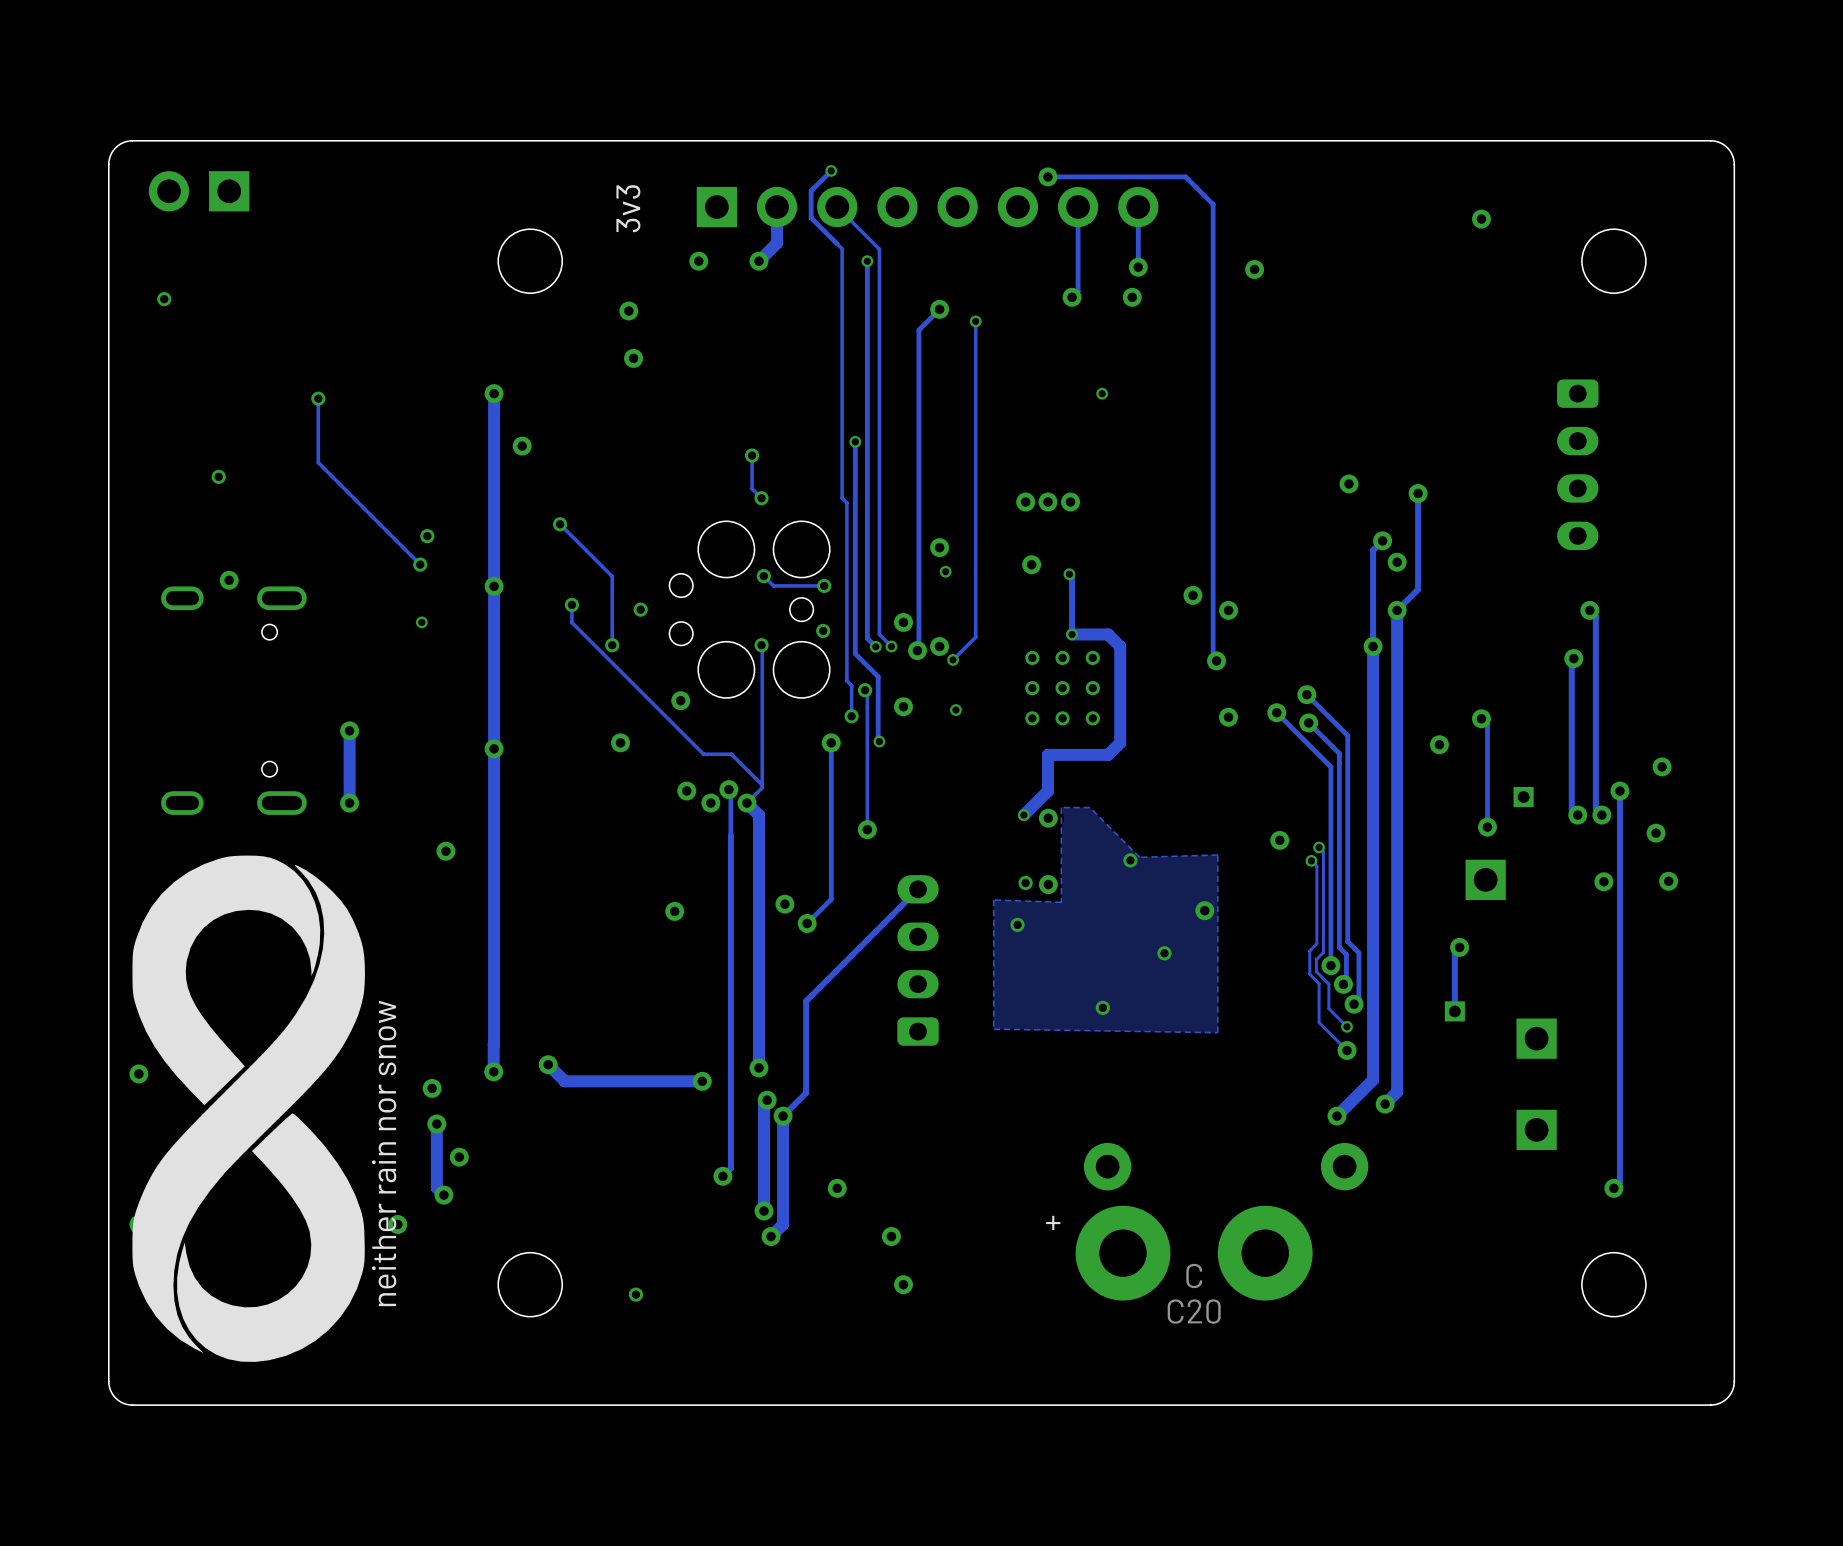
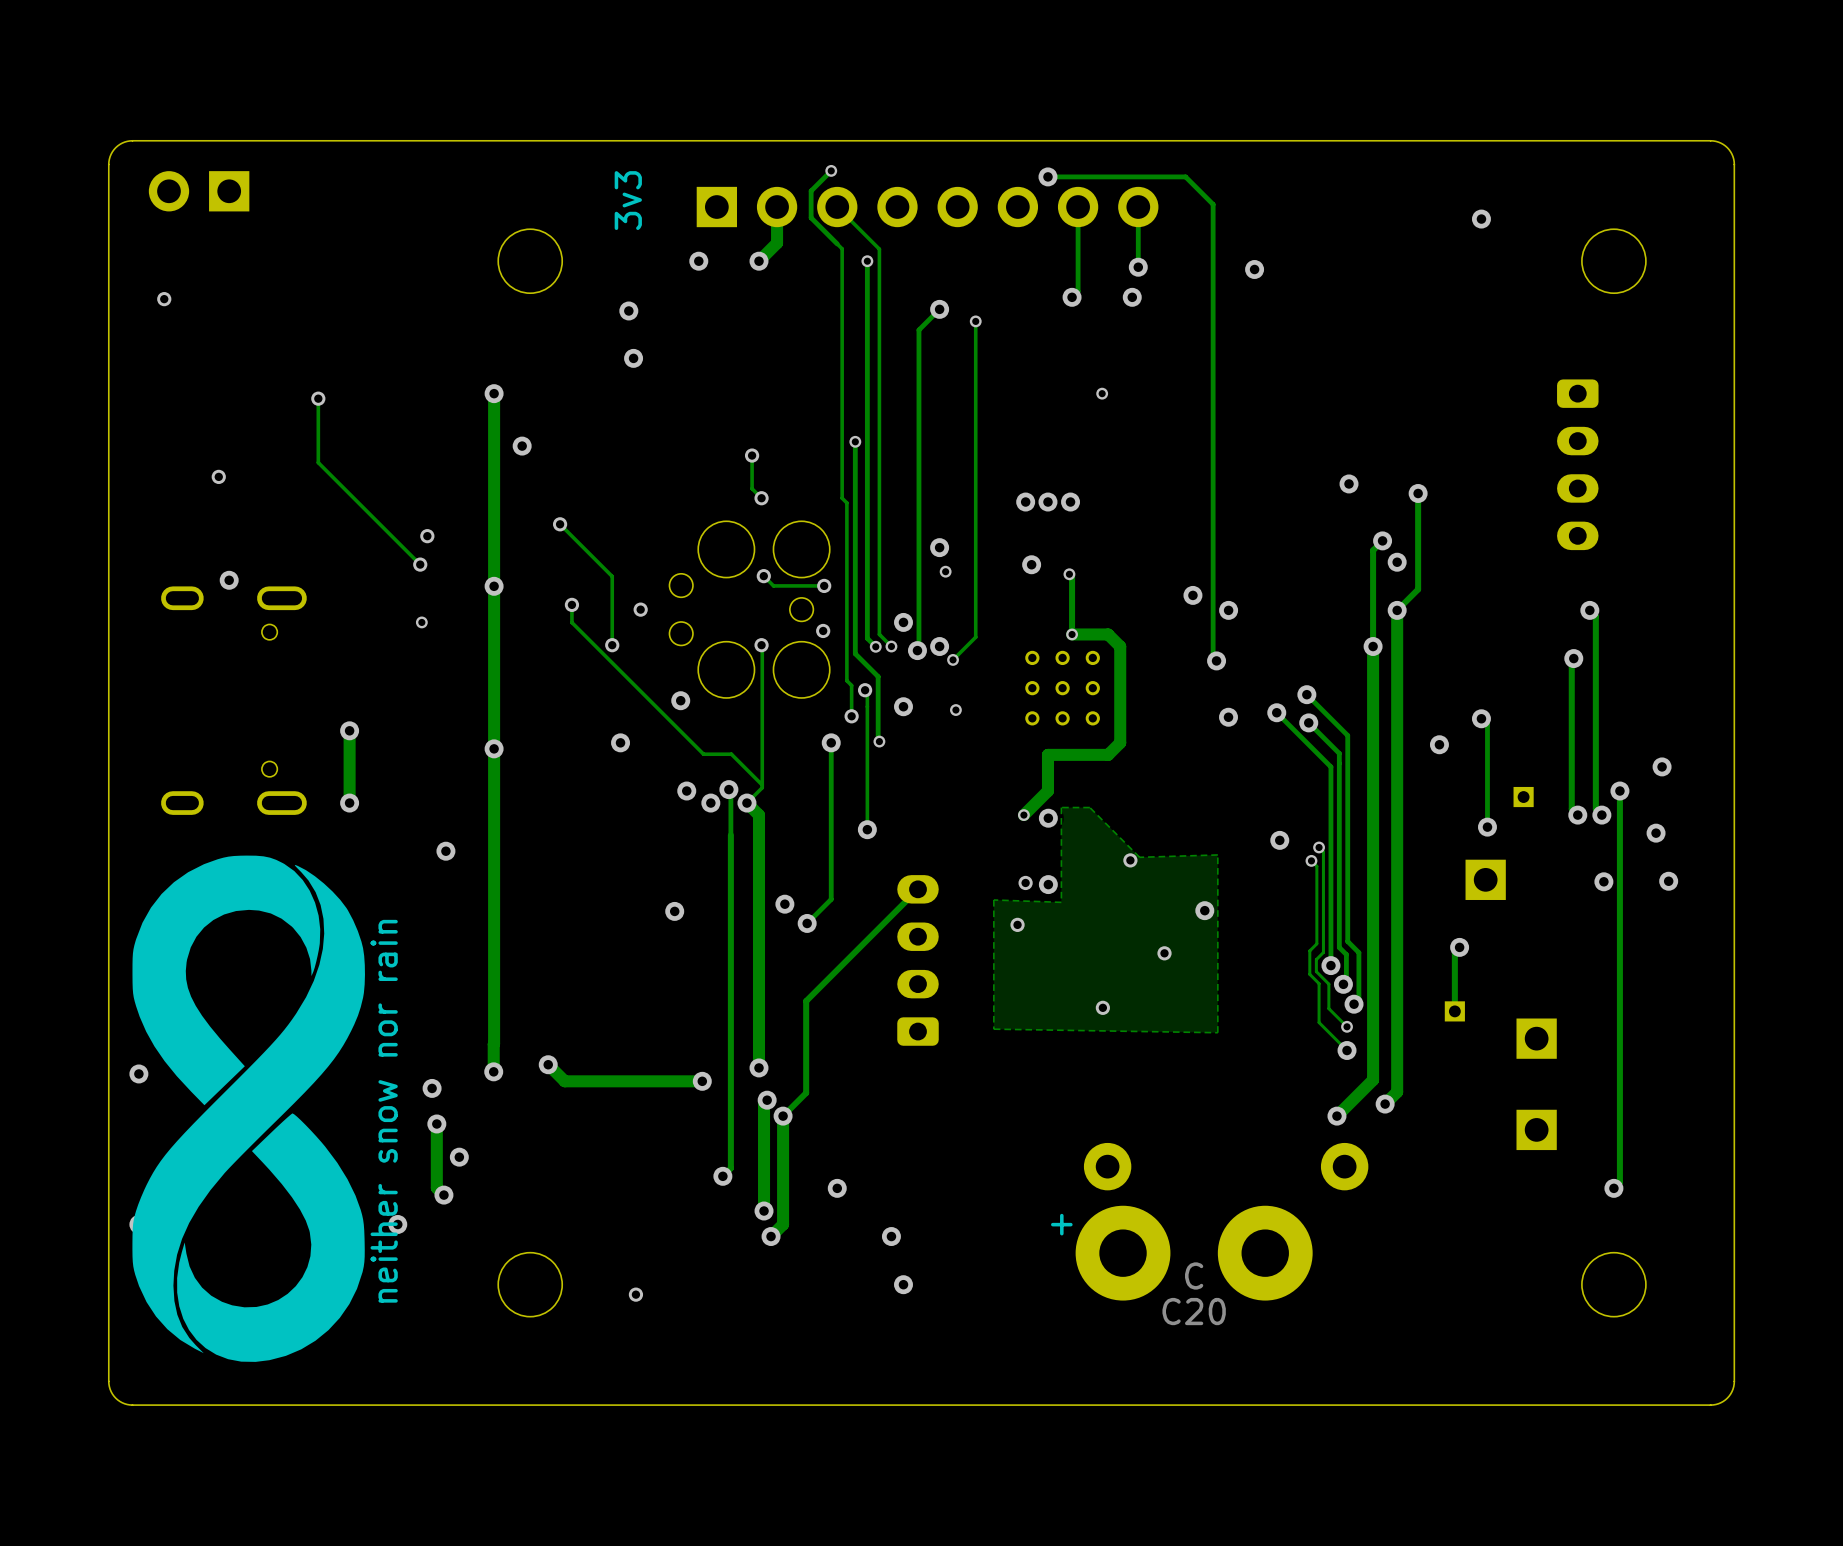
text: neither rain nor snow (384, 1153) -> neither snow nor rain (384, 1111)

